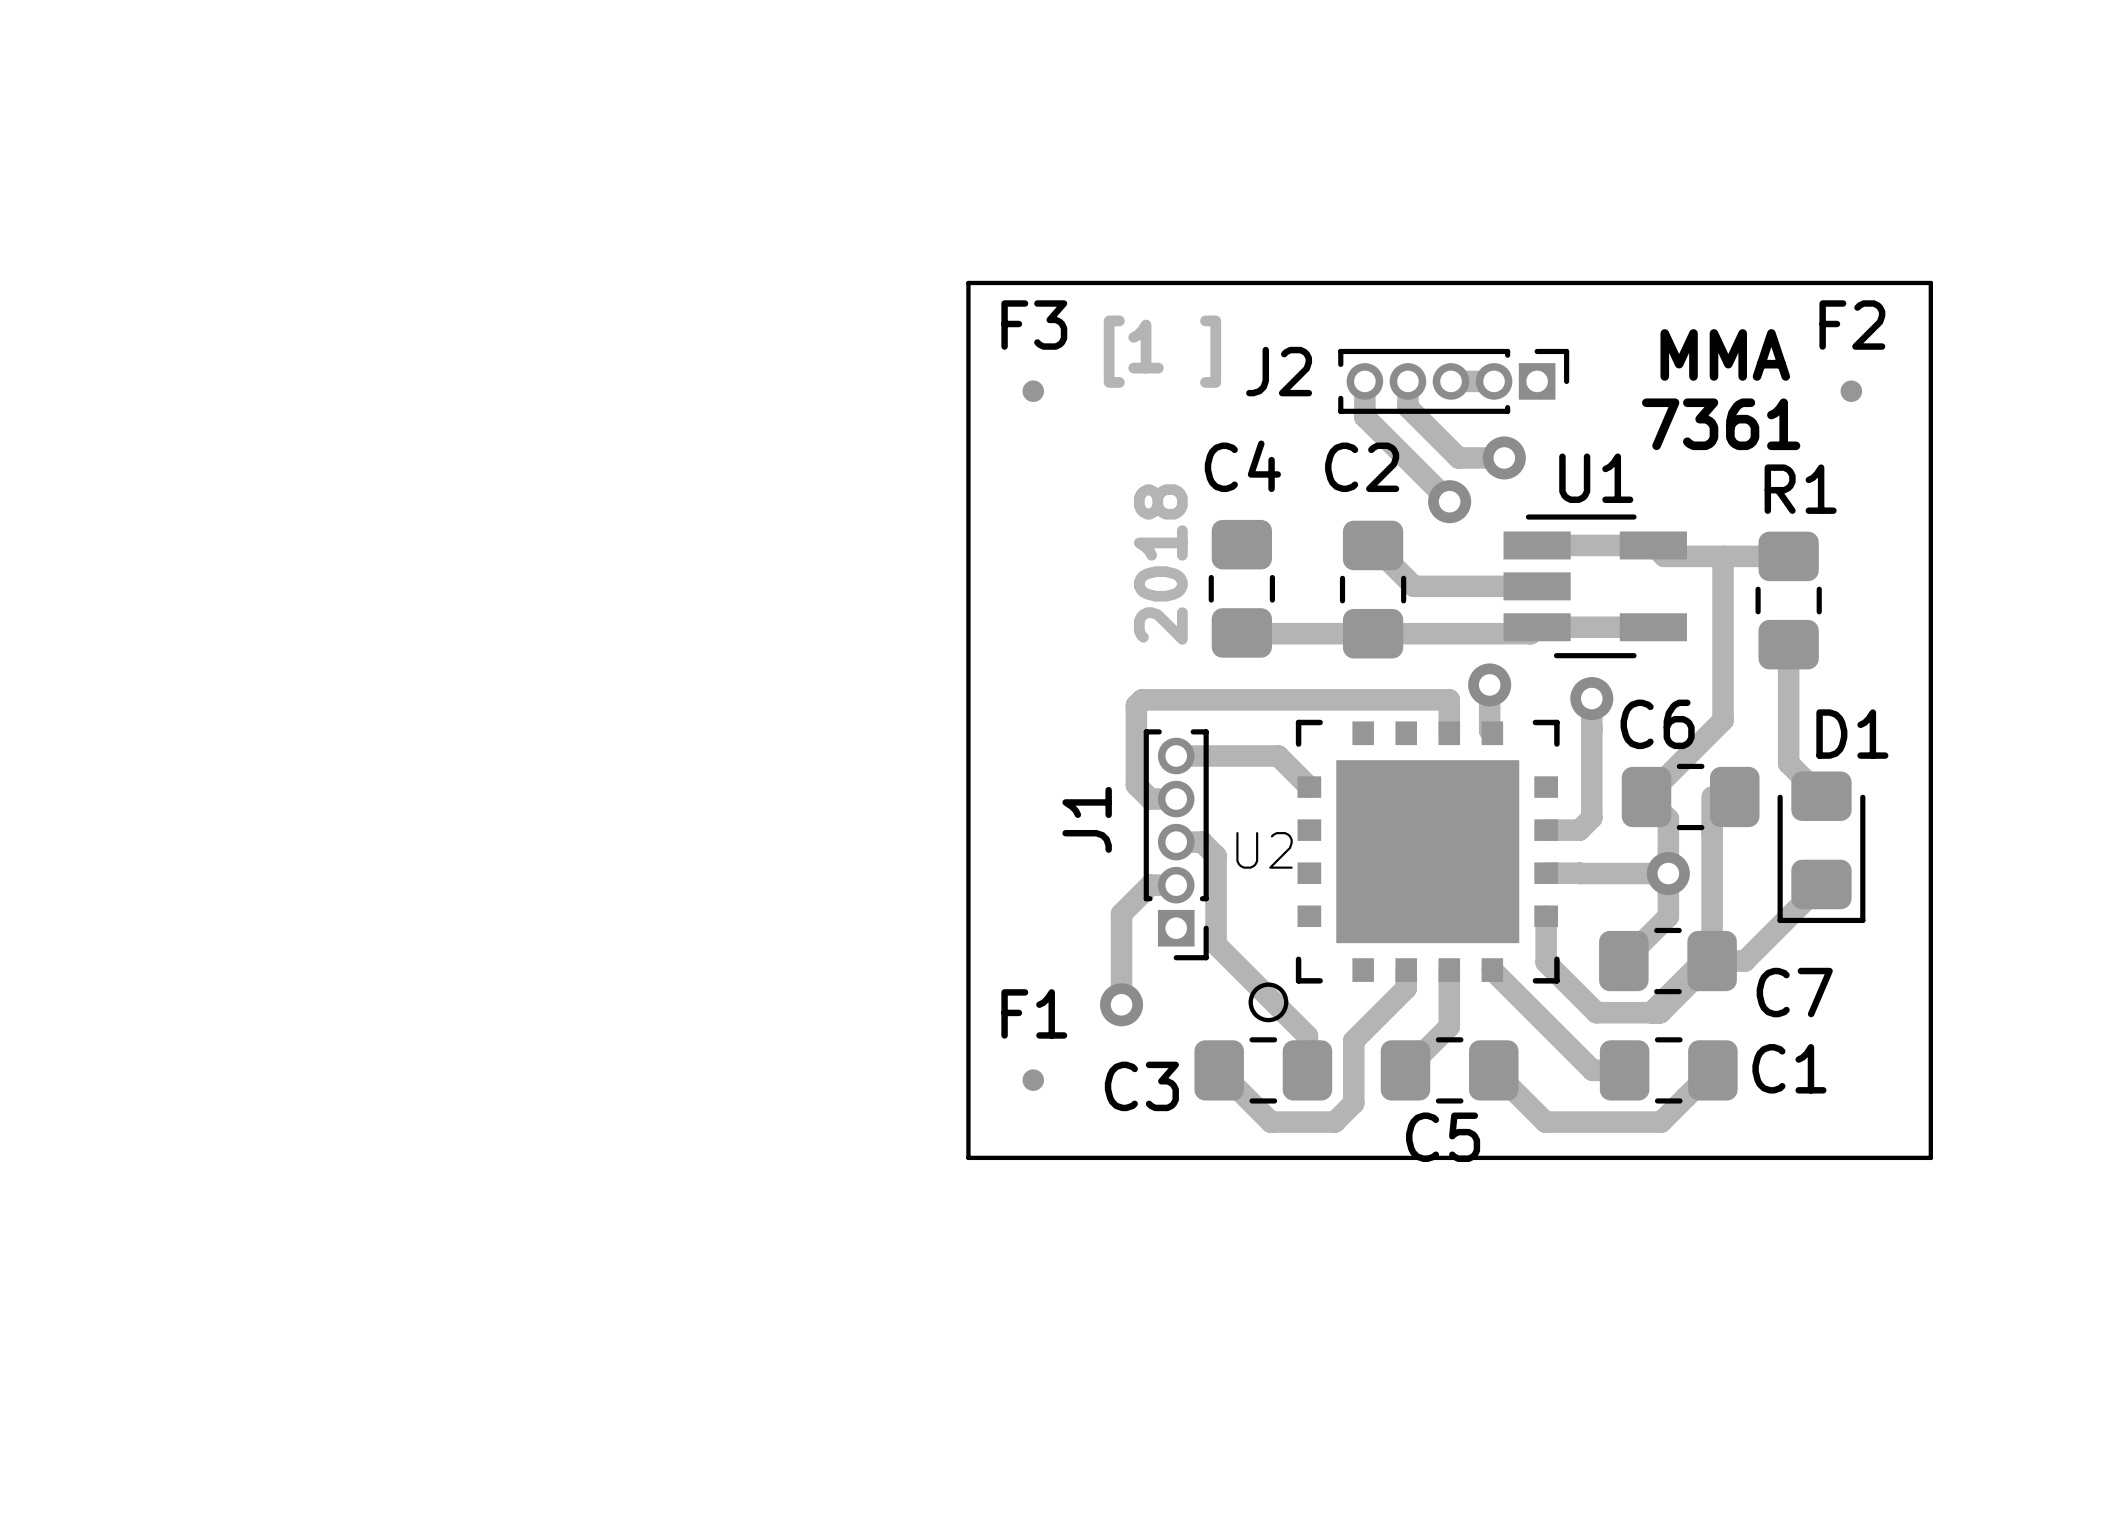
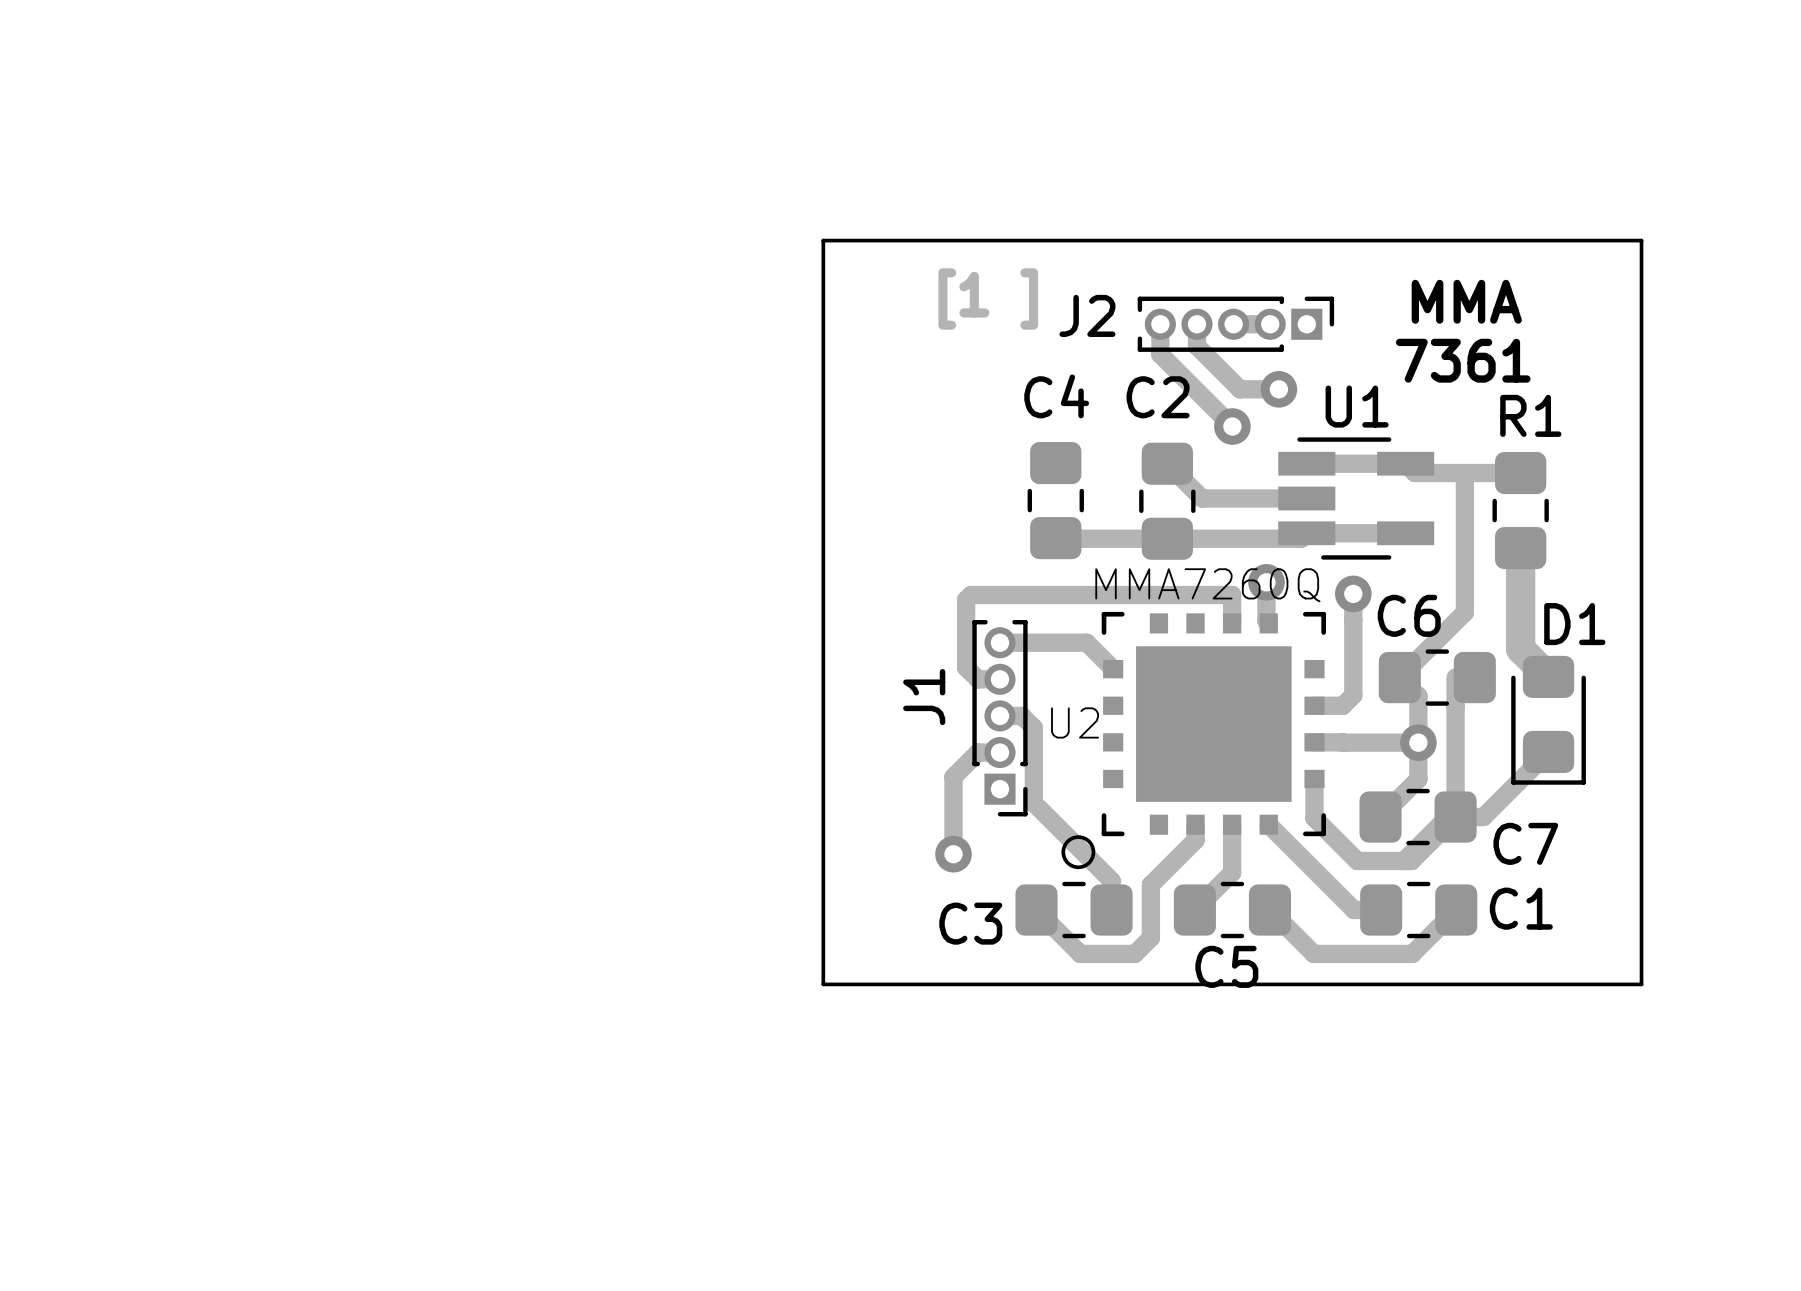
F3: (1033, 391) -> none
F2: (1851, 391) -> none
text: 2018 (1160, 564) -> none
track width: thin (1788, 644) (1788, 763) (1821, 796) -> thick (1520, 548) (1520, 649) (1548, 676)
U2 value: none -> MMA7260Q (1207, 585)
F1: (1033, 1080) -> none

